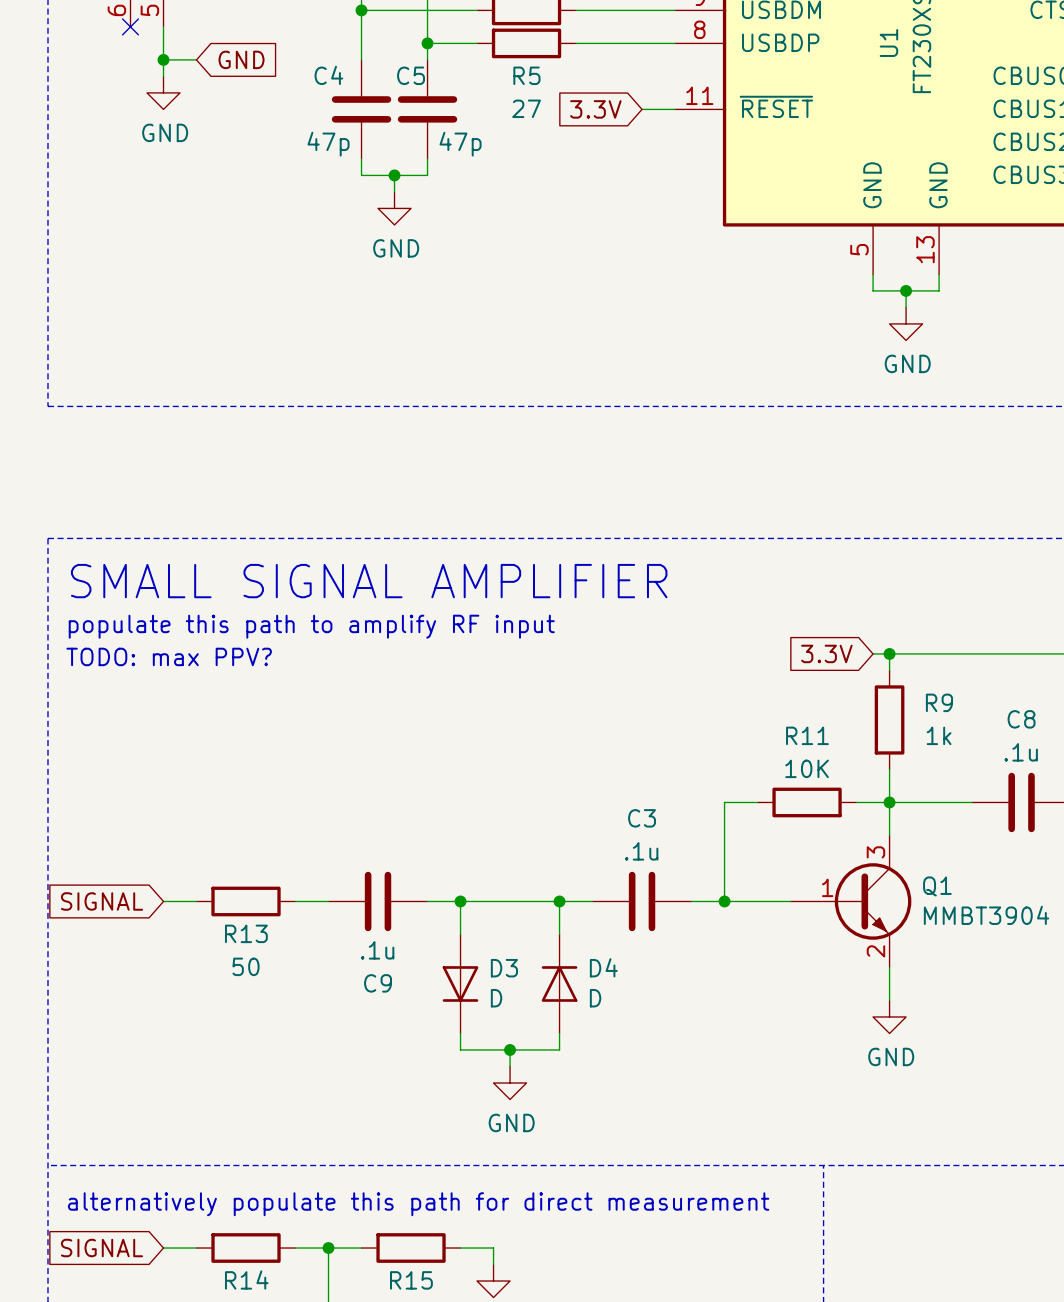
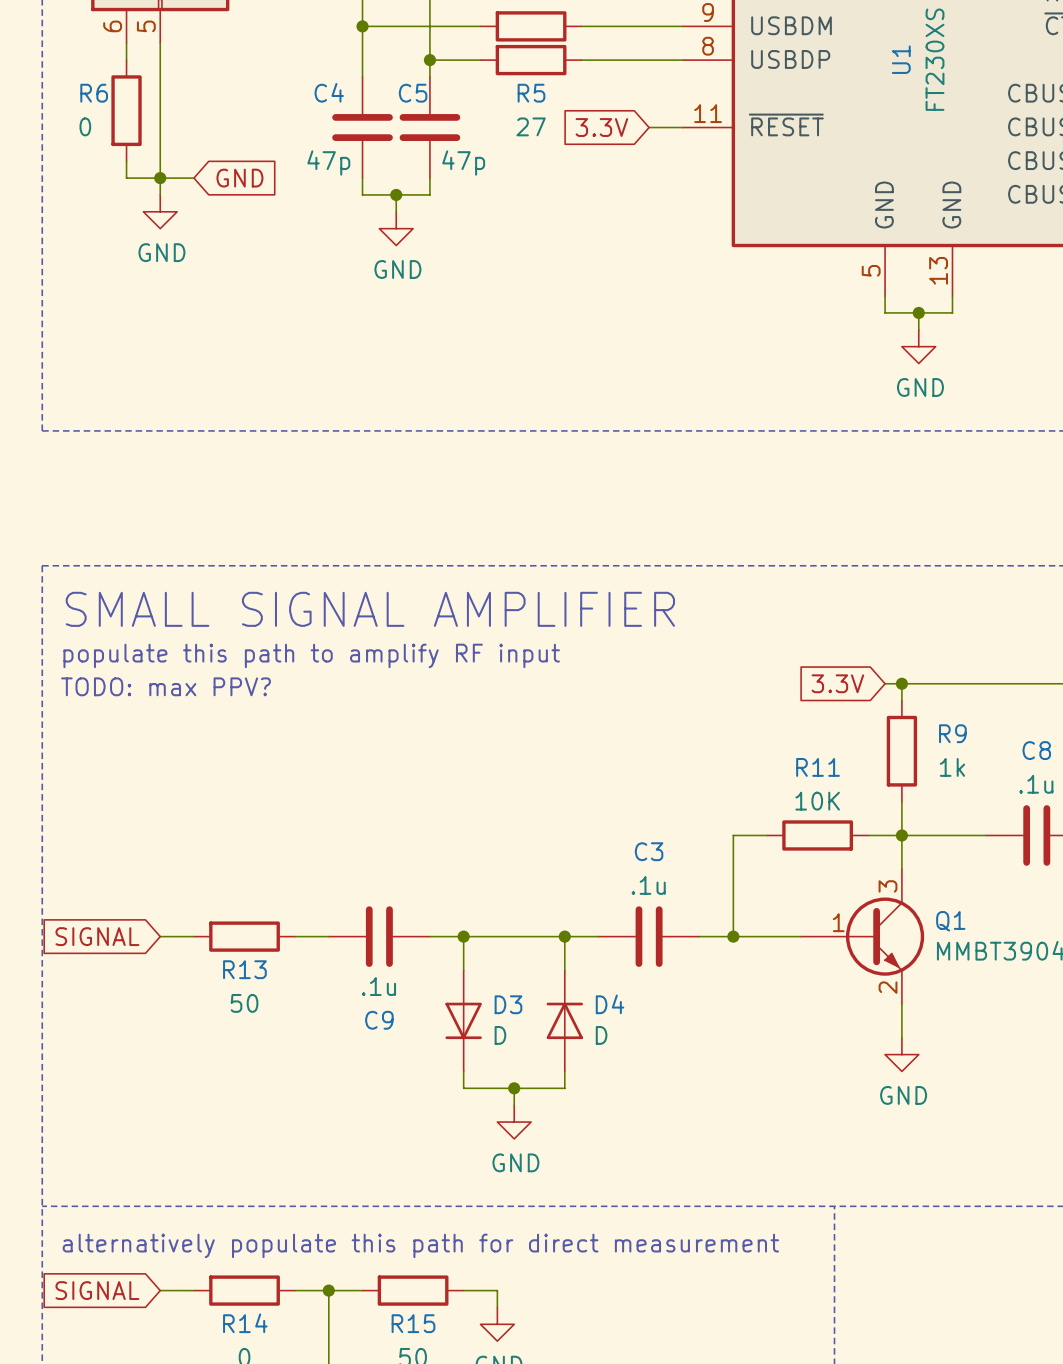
wire: none -> (126, 43) (126, 60)
no-connect mark: (130, 26) -> none
wire: (163, 59) (196, 59) -> none
junction: (163, 59) -> none
global label position: GND (241, 59) -> GND (239, 178)
wire: none -> (160, 93) (160, 194)
R6: none -> 0 (126, 110)
power symbol position: GND (163, 92) -> GND (160, 211)
wire: none -> (126, 161) (126, 178) (193, 178)
junction: none -> (160, 178)

